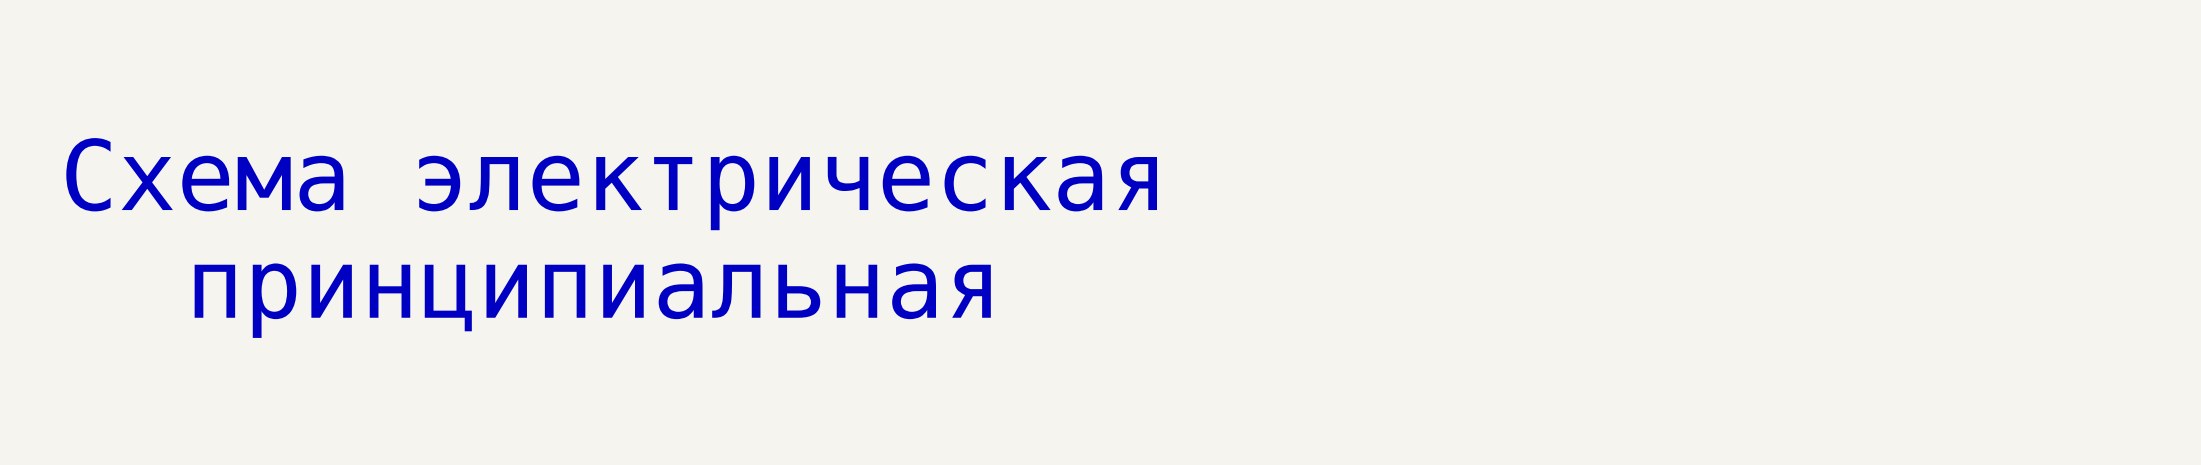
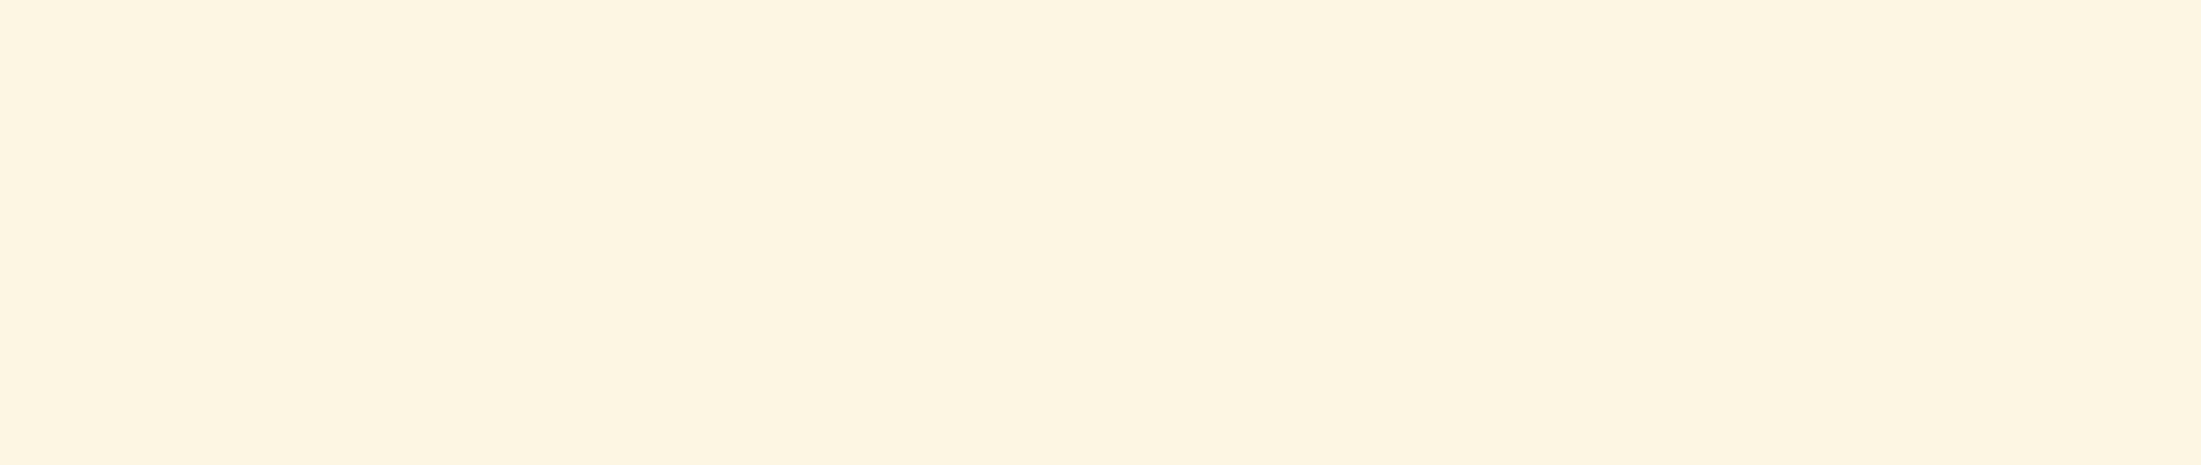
text: Схема электрическая (611, 184) -> none
text: принципиальная (592, 300) -> none

